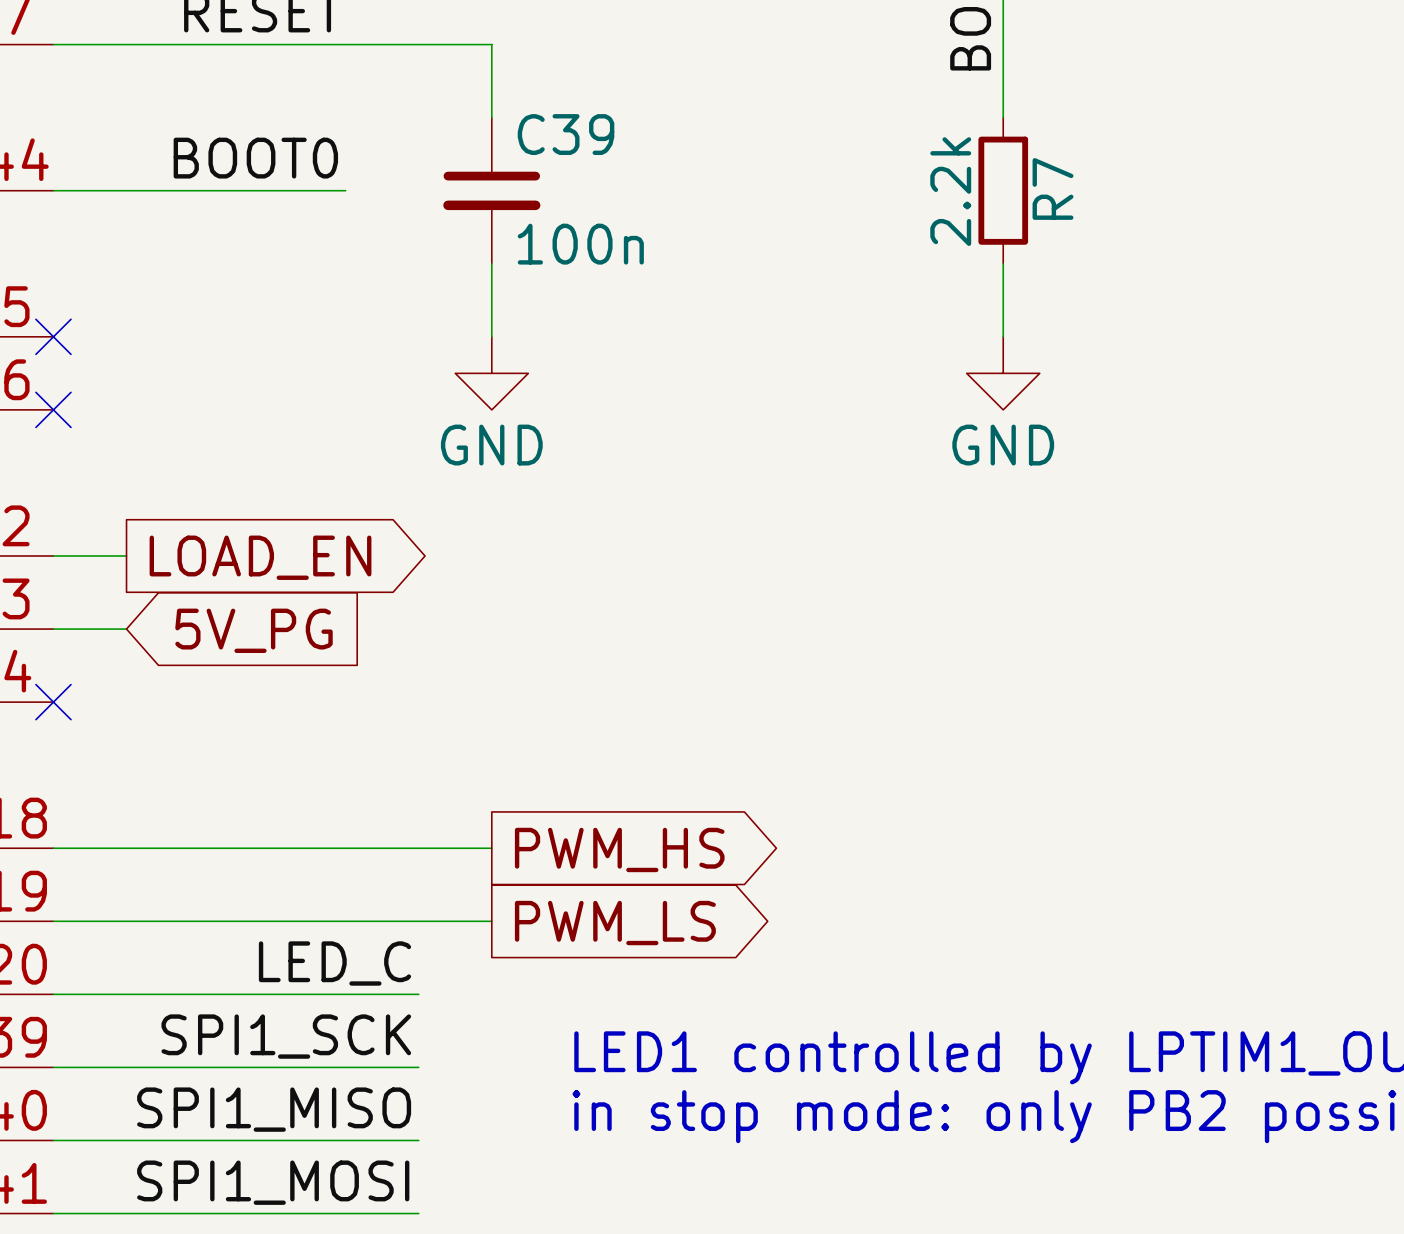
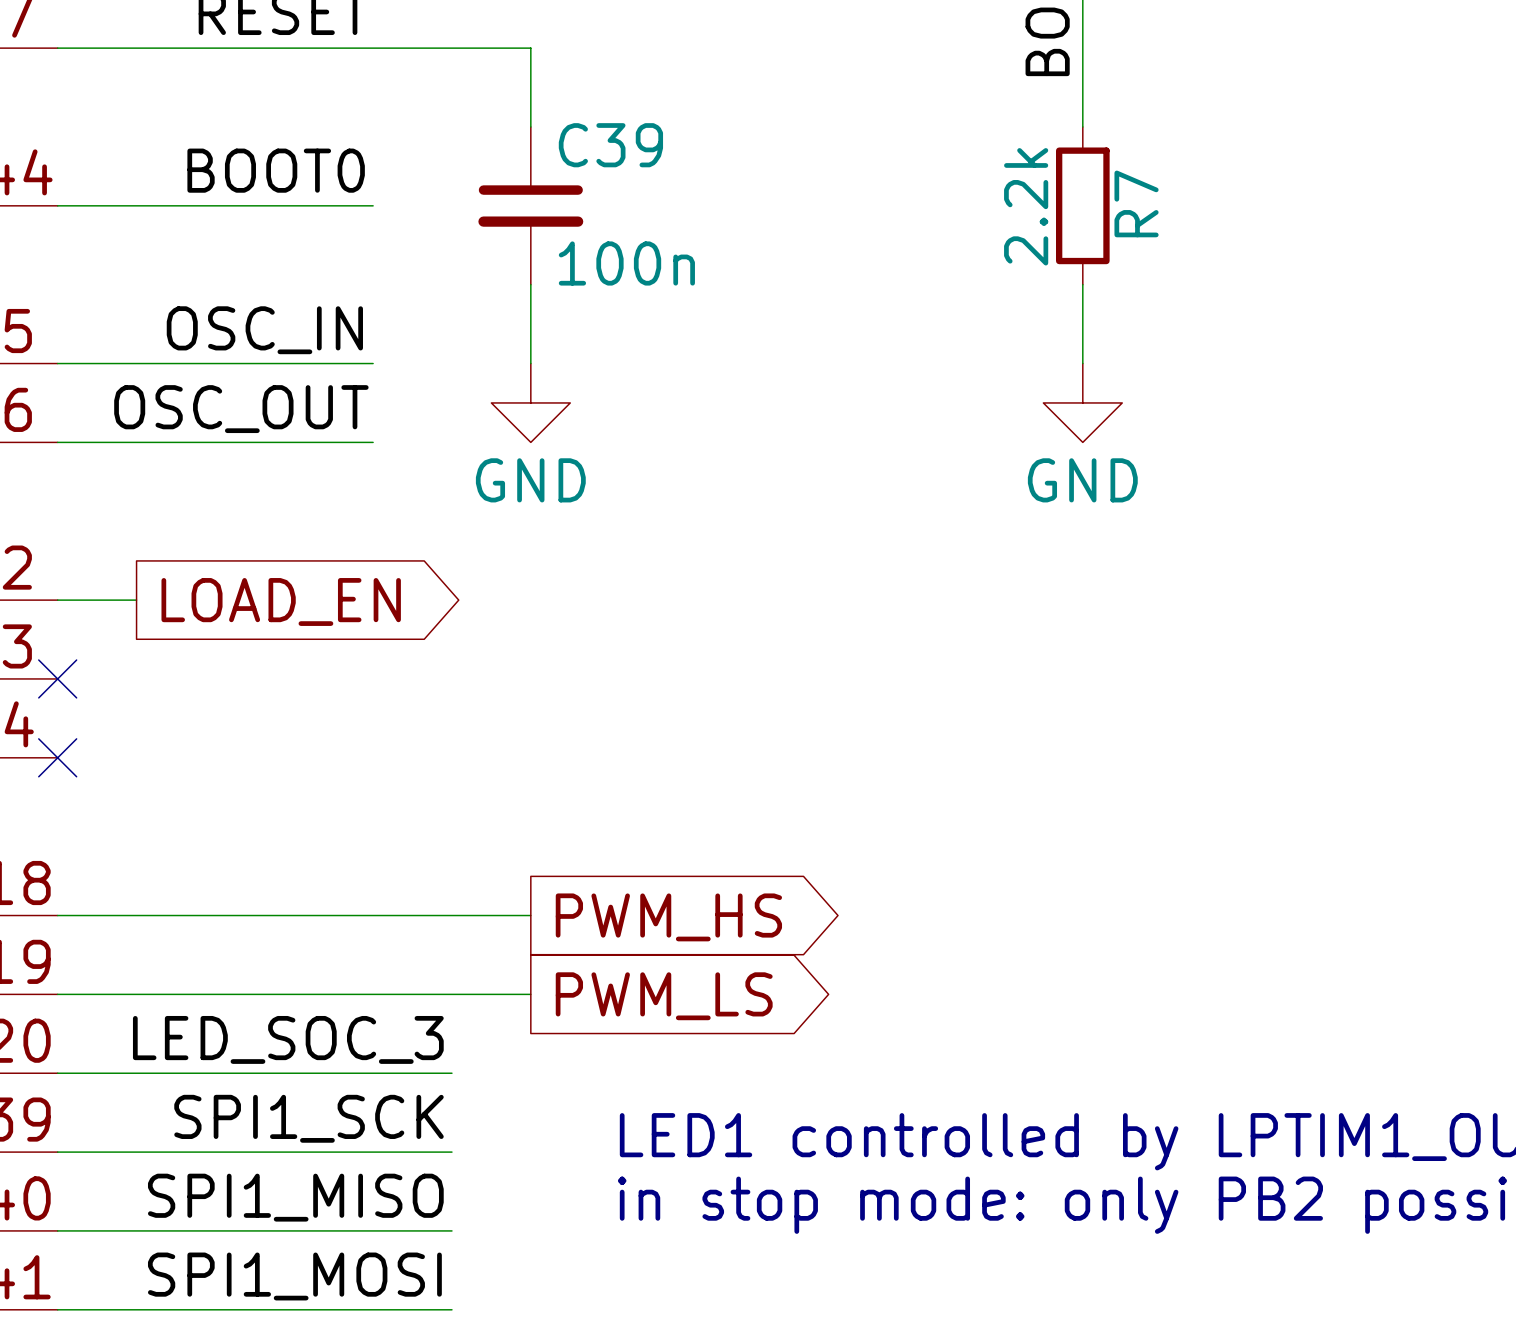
label: none -> OSC_IN (264, 330)
wire: none -> (57, 363) (373, 363)
no-connect mark: (53, 336) -> none
label: none -> OSC_OUT (241, 409)
wire: none -> (57, 442) (373, 442)
no-connect mark: (53, 409) -> none
wire: (53, 629) (126, 629) -> none
no-connect mark: none -> (57, 678)
global label: 5V_PG (253, 630) -> none
label: LED_C (334, 963) -> LED_SOC_3 (288, 1039)

